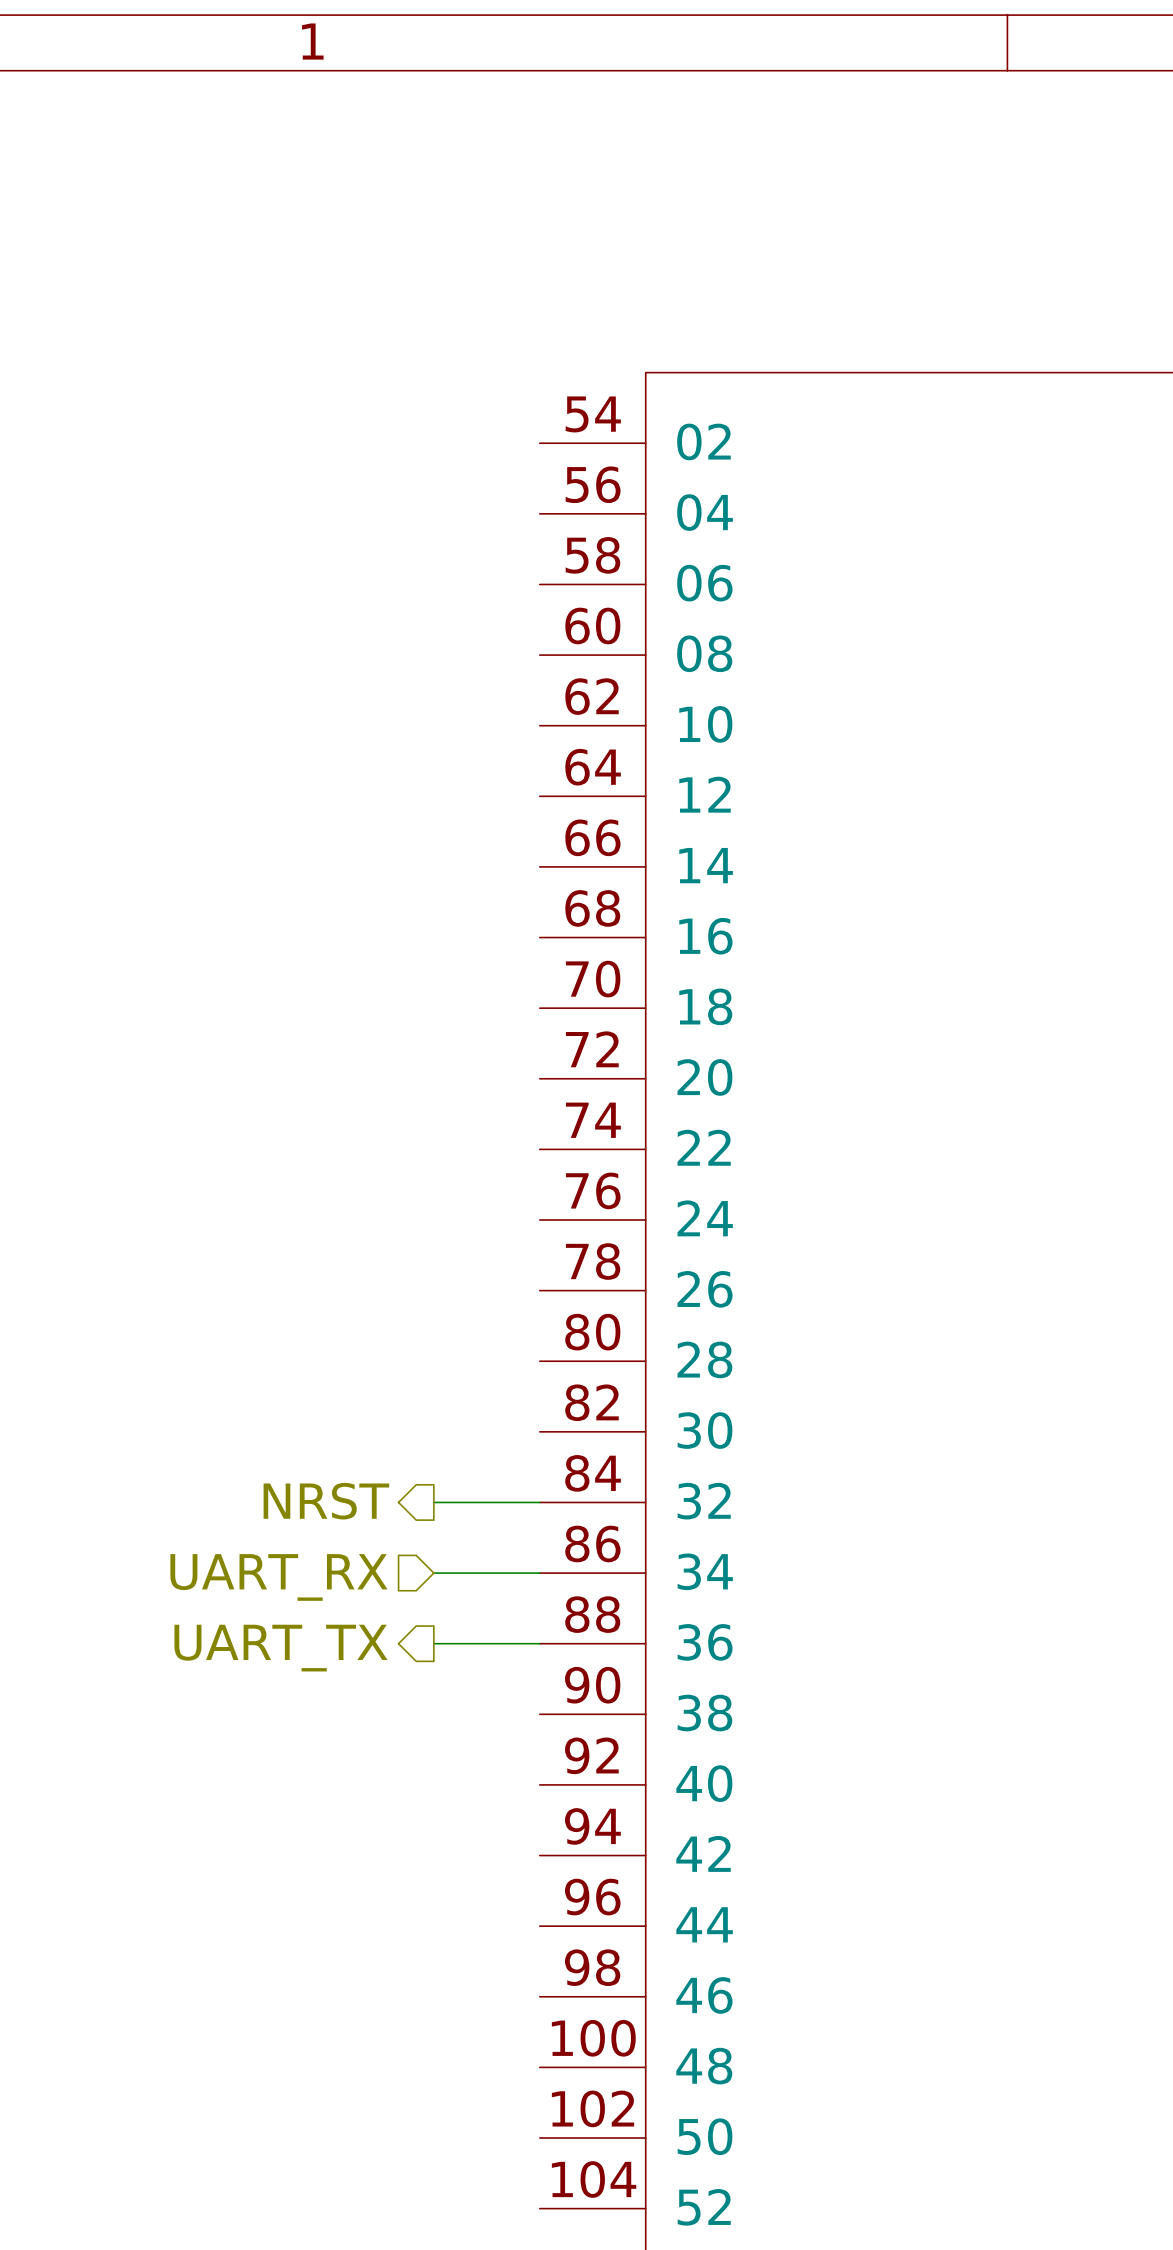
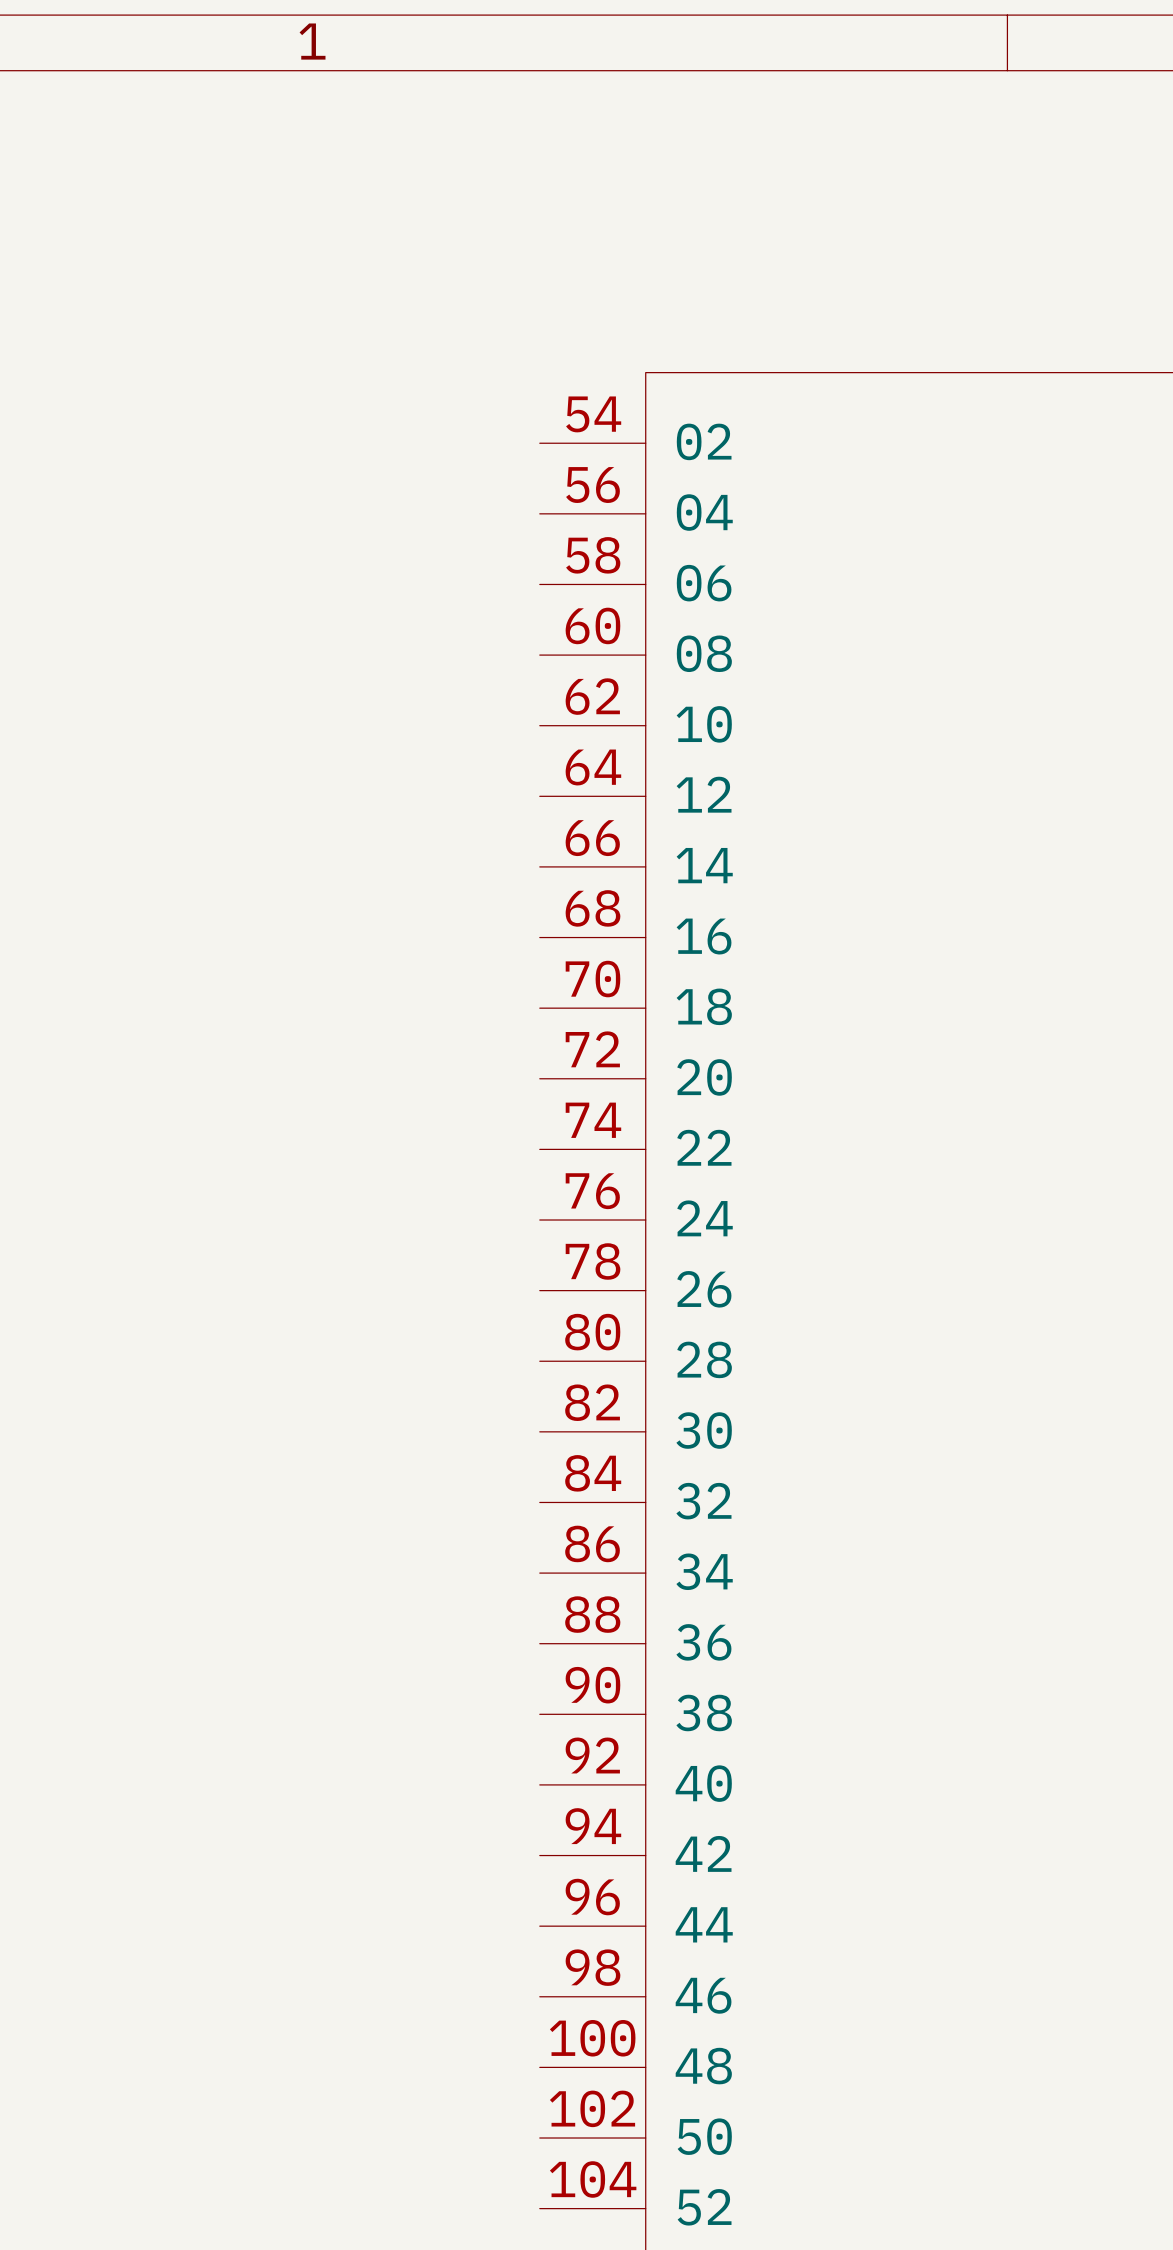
hierarchical label: NRST (326, 1501) -> none
wire: (433, 1502) (539, 1502) -> none
wire: (433, 1573) (539, 1573) -> none
hierarchical label: UART_RX (278, 1577) -> none
wire: (433, 1643) (539, 1643) -> none
hierarchical label: UART_TX (280, 1648) -> none

